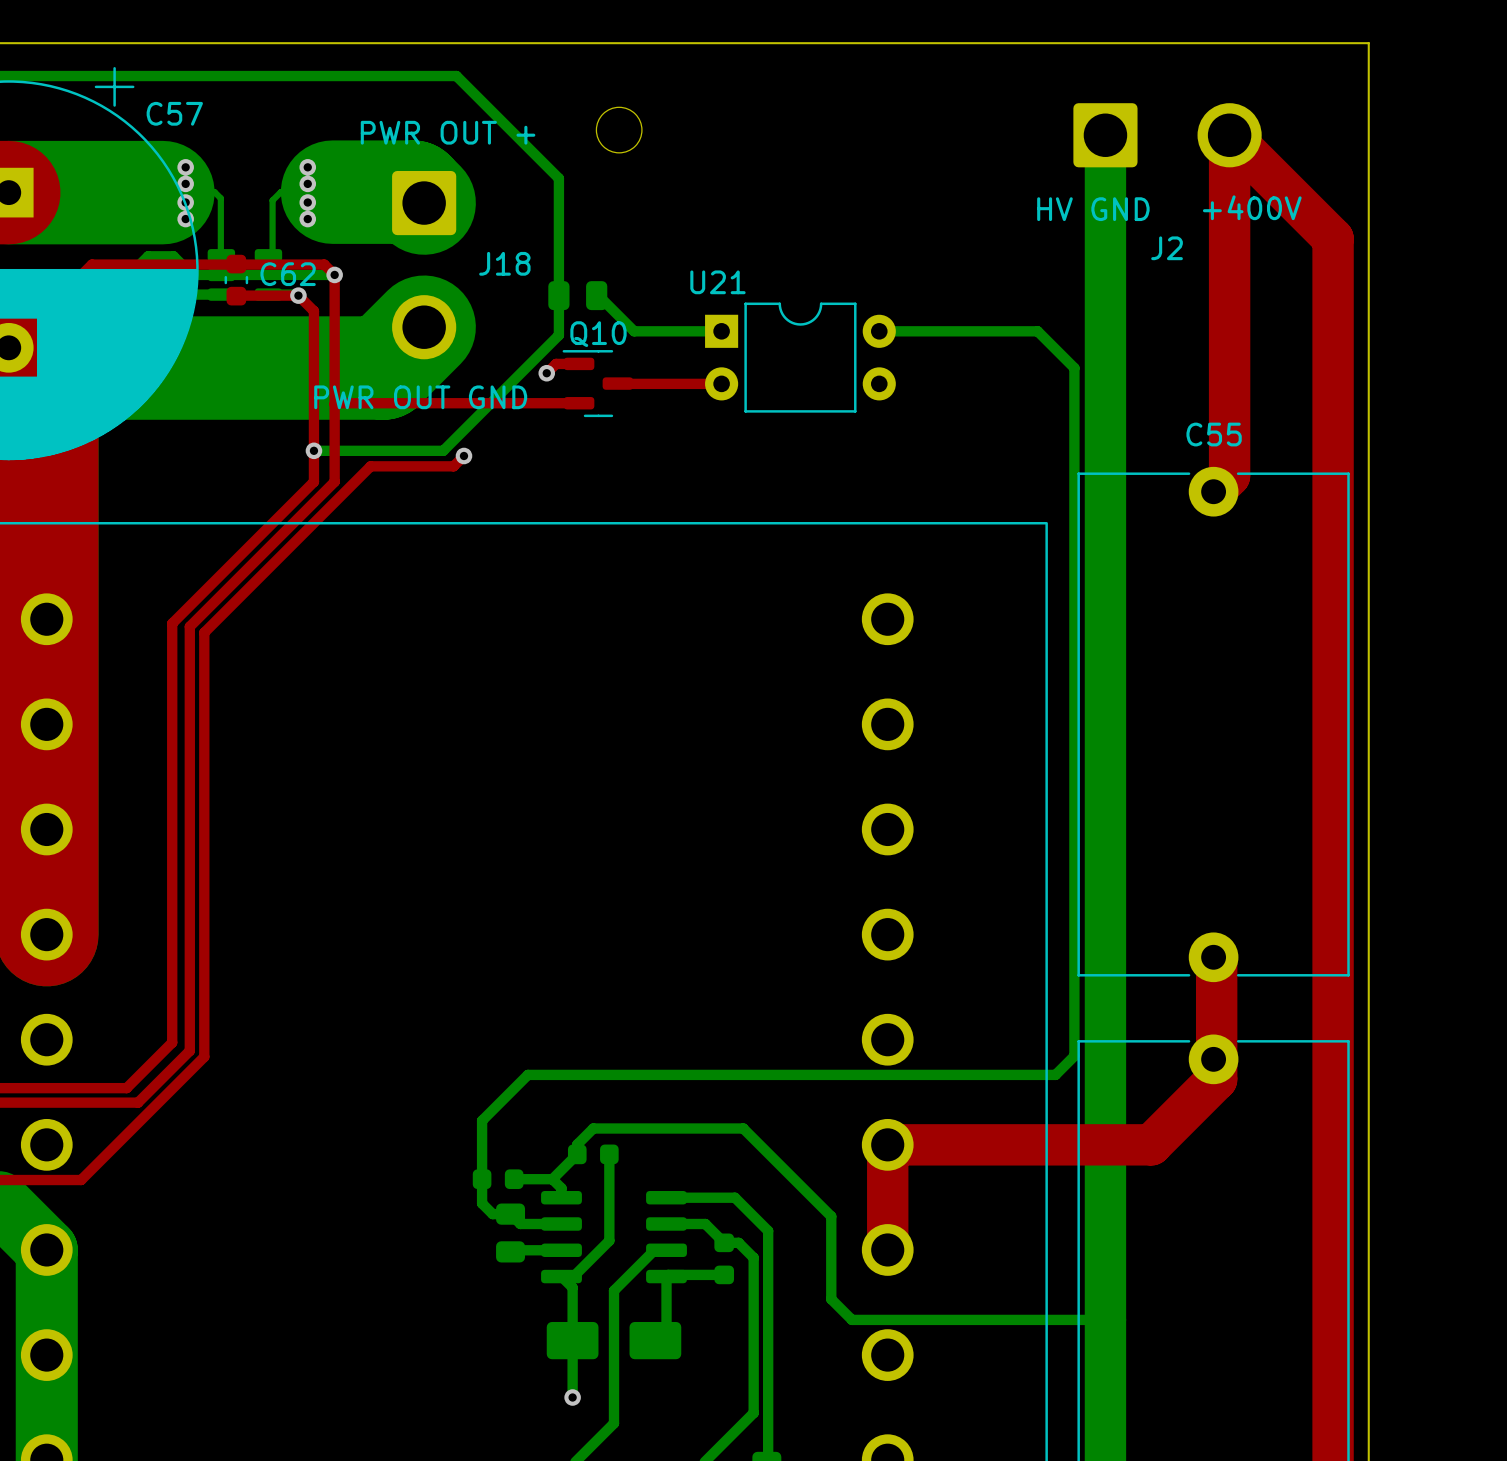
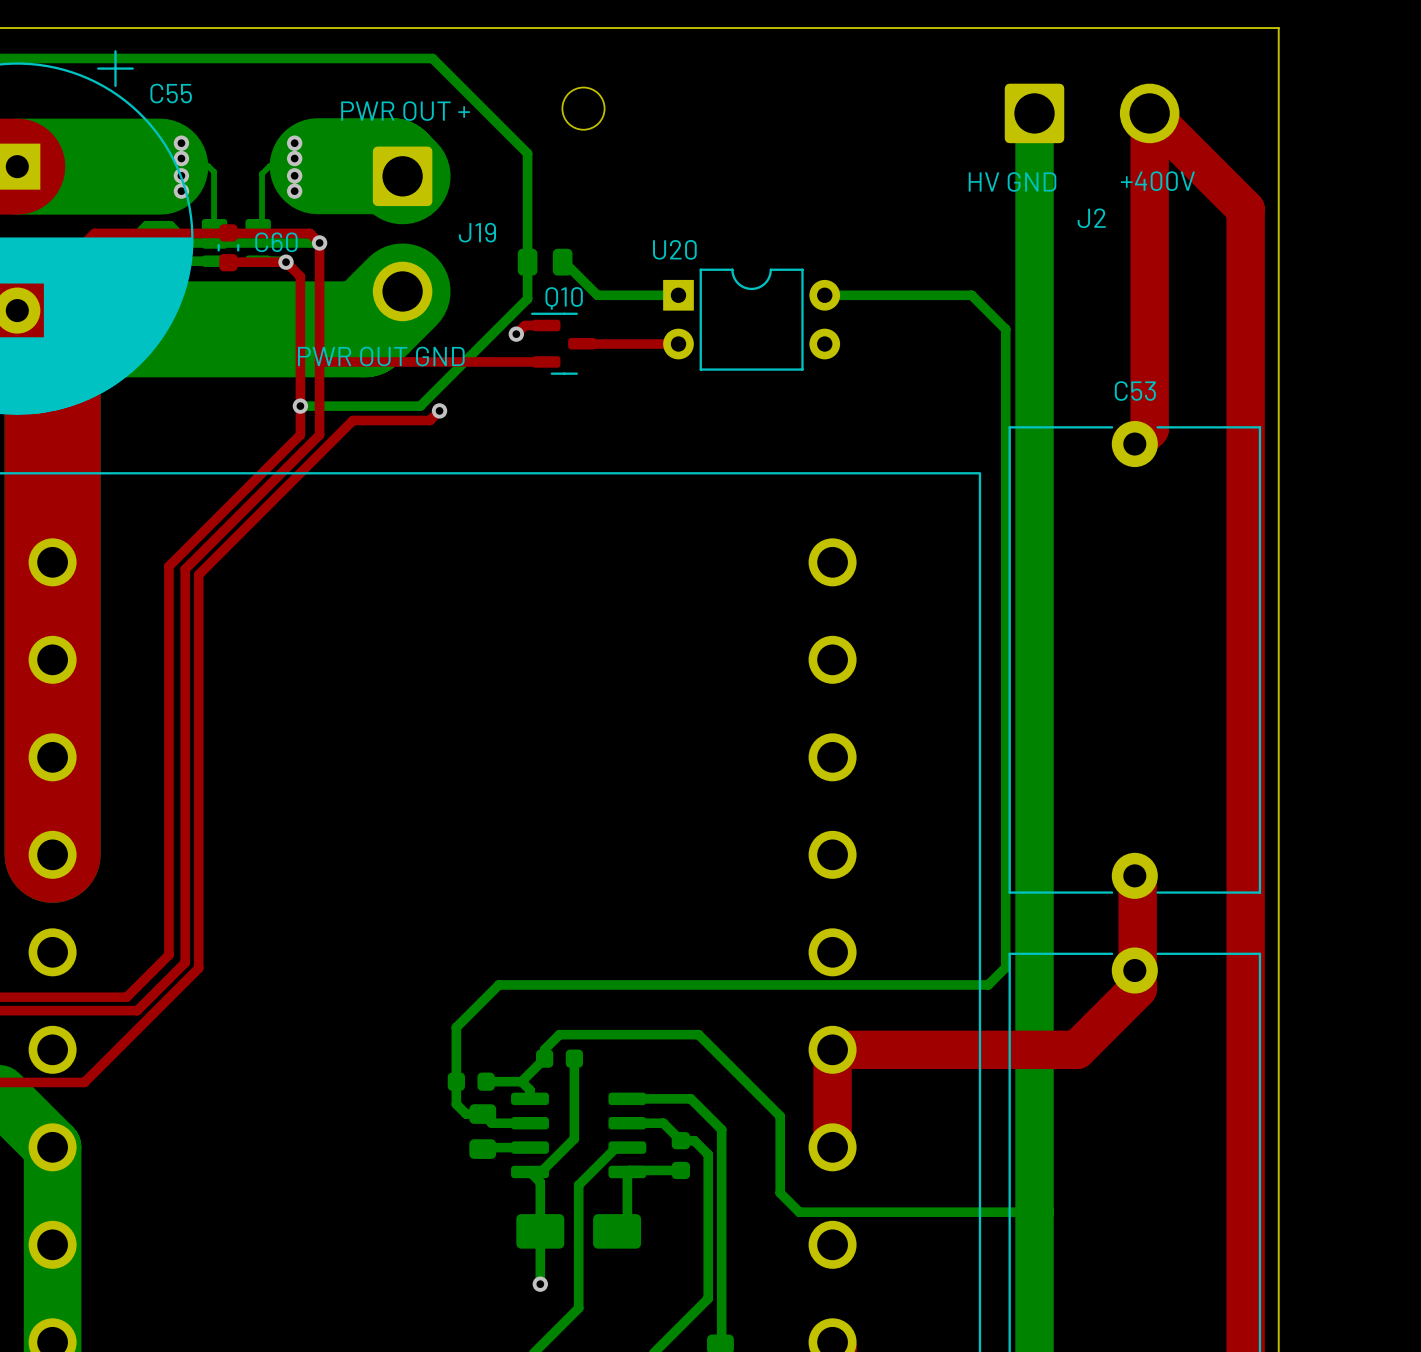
C57 name: C57 (174, 113) -> C55 (171, 93)
J18 name: J18 (504, 263) -> J19 (477, 232)
C62 name: C62 (288, 274) -> C60 (276, 242)
U21 name: U21 (717, 282) -> U20 (674, 249)
C55 name: C55 (1214, 434) -> C53 (1135, 391)

